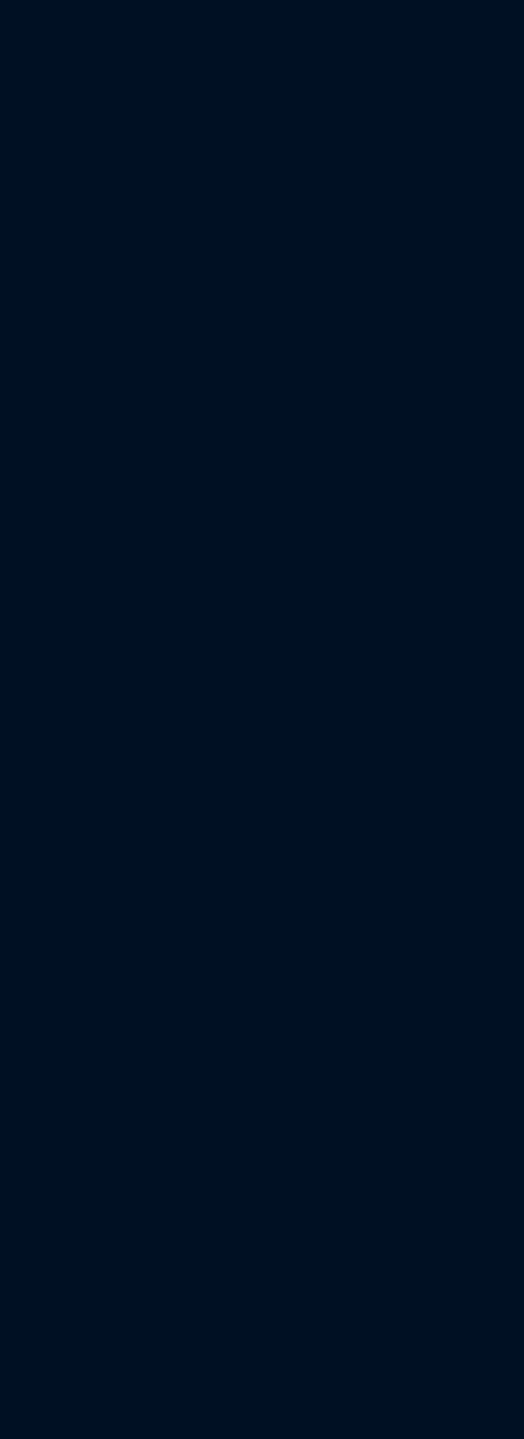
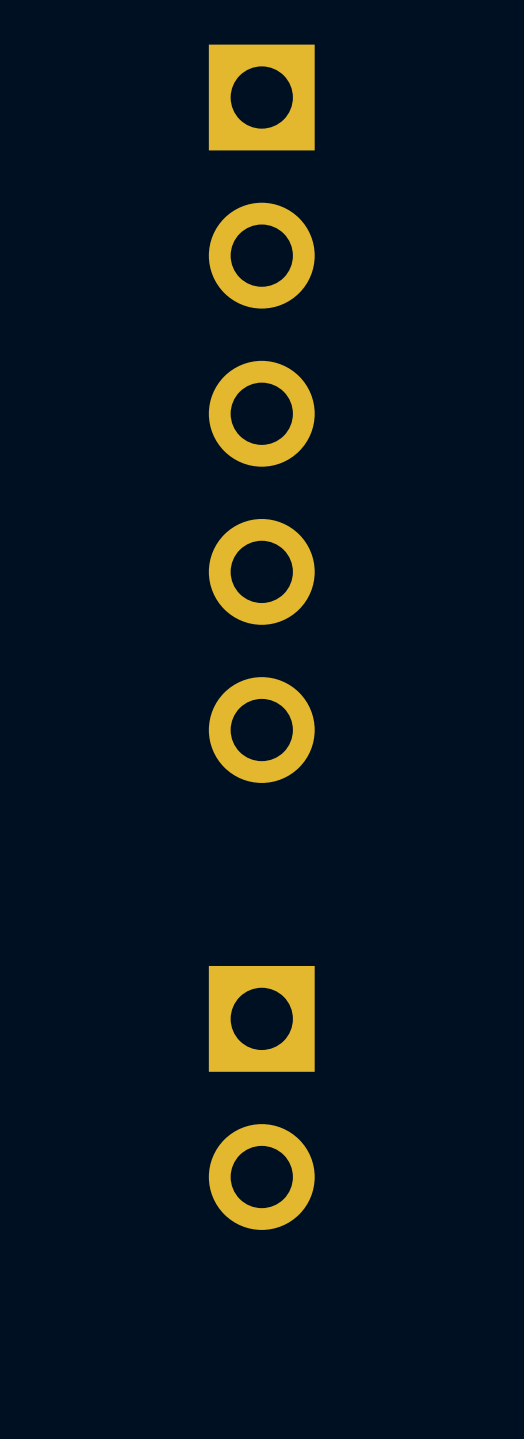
part: none -> (261, 413)
part: none -> (261, 1097)

